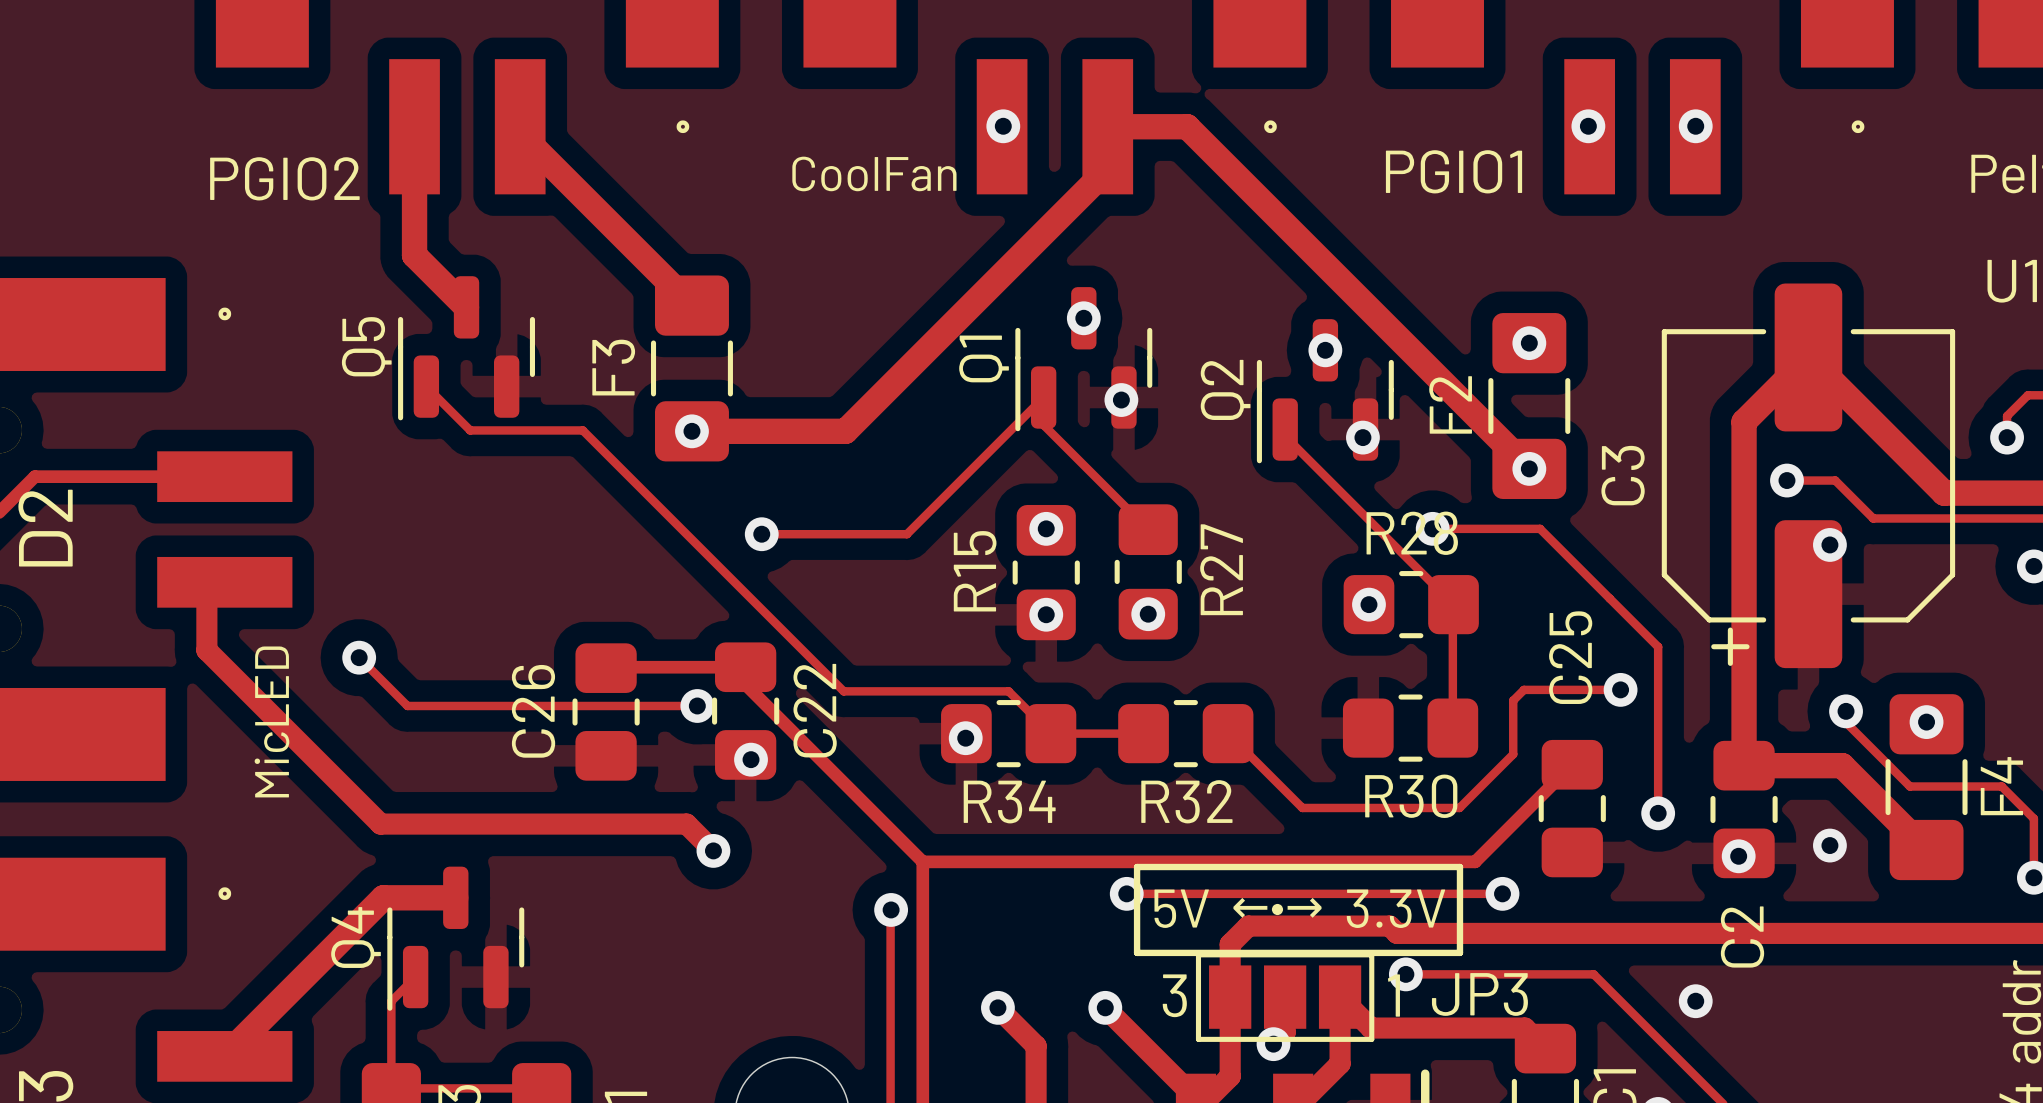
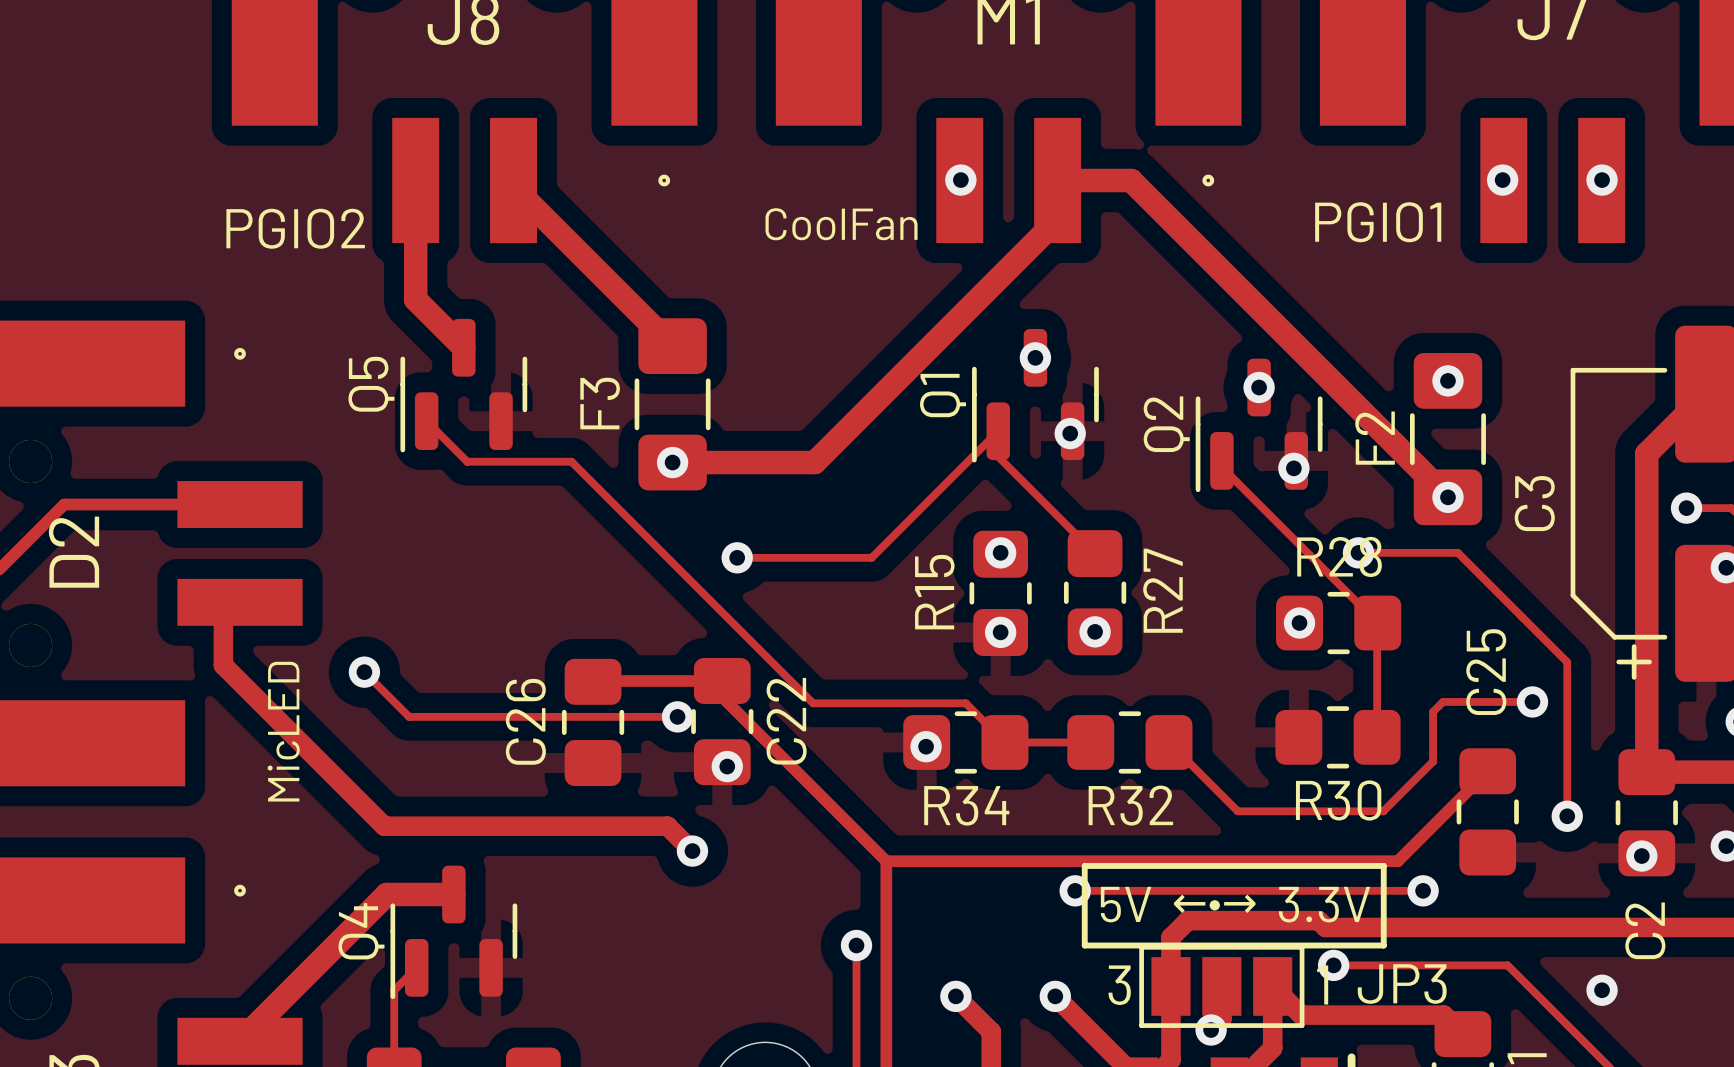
via position: (891, 909) -> (856, 945)
track: (890, 910) (890, 952) -> none

